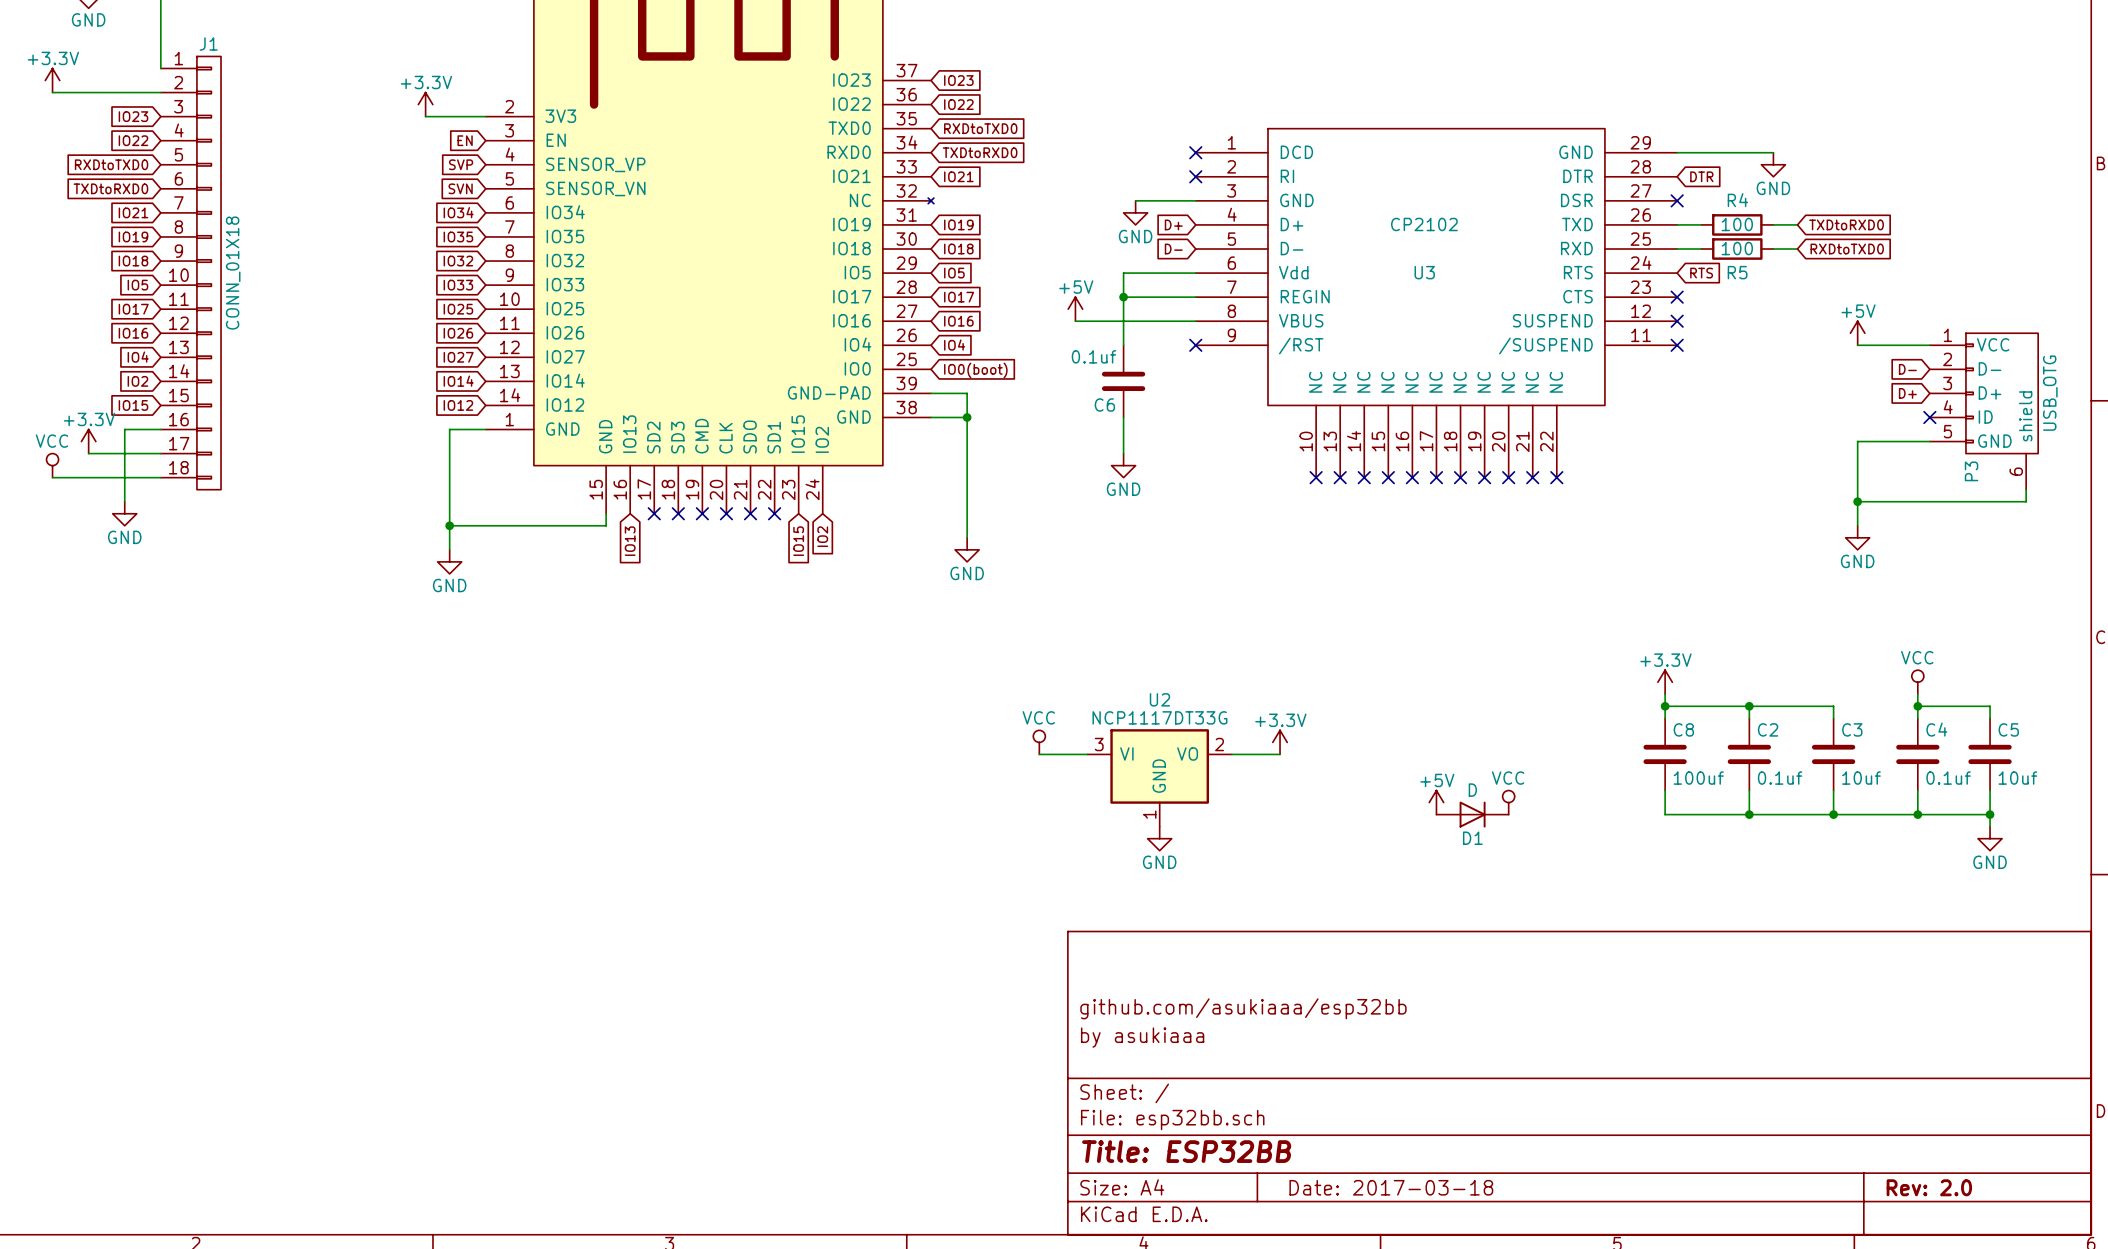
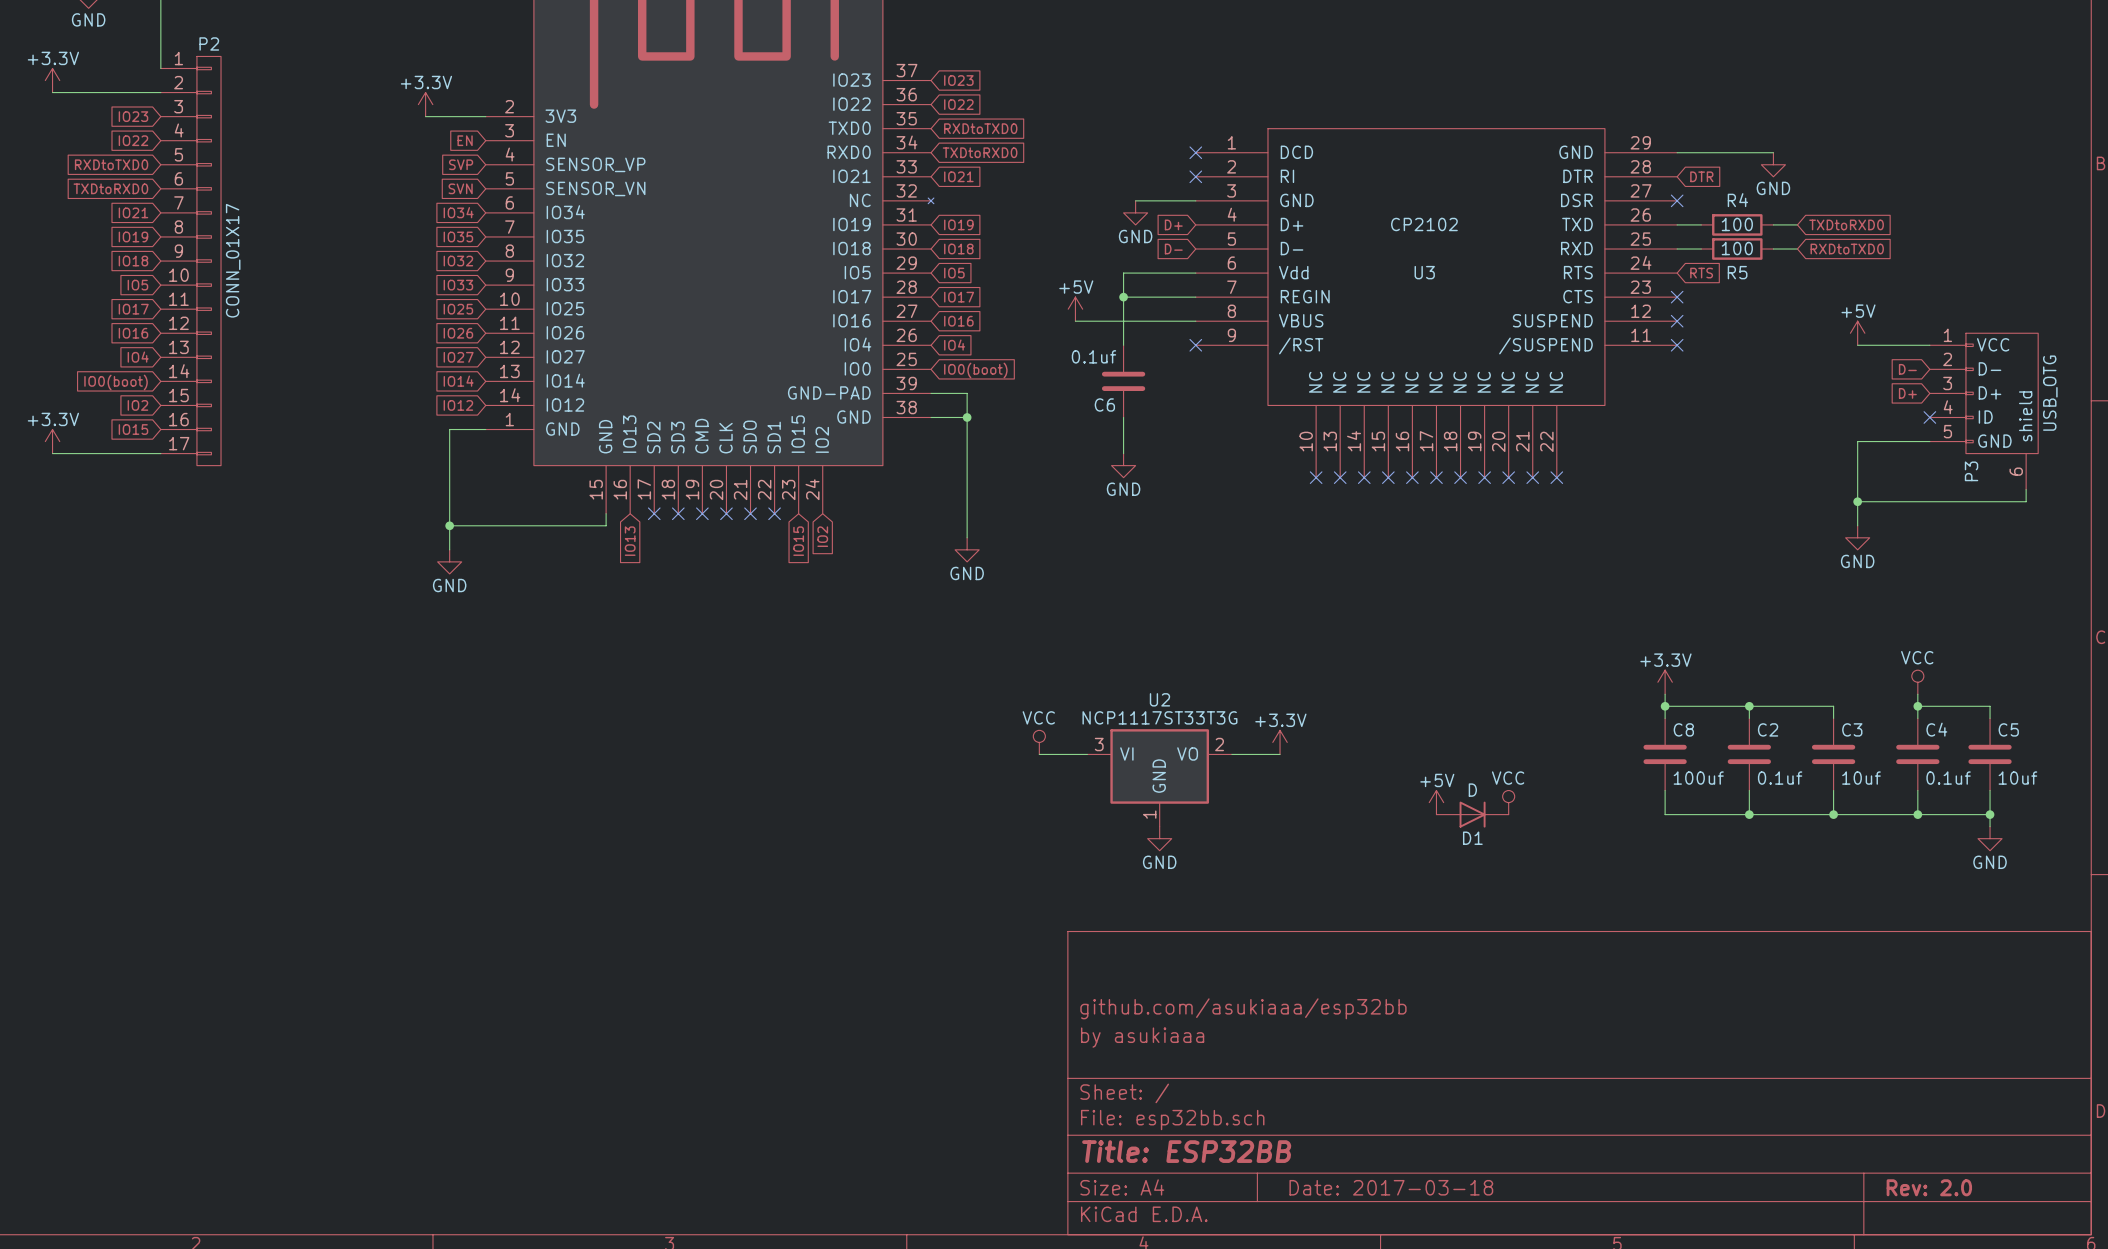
P2: none -> CONN_01X17 (190, 261)
J1: CONN_01X18 (190, 273) -> none
global label: IO2 (137, 381) -> IO0(boot) (116, 382)
global label: IO15 (133, 405) -> IO2 (137, 405)
global label: none -> IO15 (133, 429)
wire: (160, 429) (124, 429) (124, 501) -> none
power symbol position: +3.3V (88, 441) -> +3.3V (52, 441)
wire: none -> (52, 453) (88, 453)
power symbol: VCC (52, 465) -> none
wire: (52, 477) (160, 477) -> none
power symbol: GND (124, 513) -> none
U2 value: NCP1117DT33G (1159, 717) -> NCP1117ST33T3G (1159, 717)

